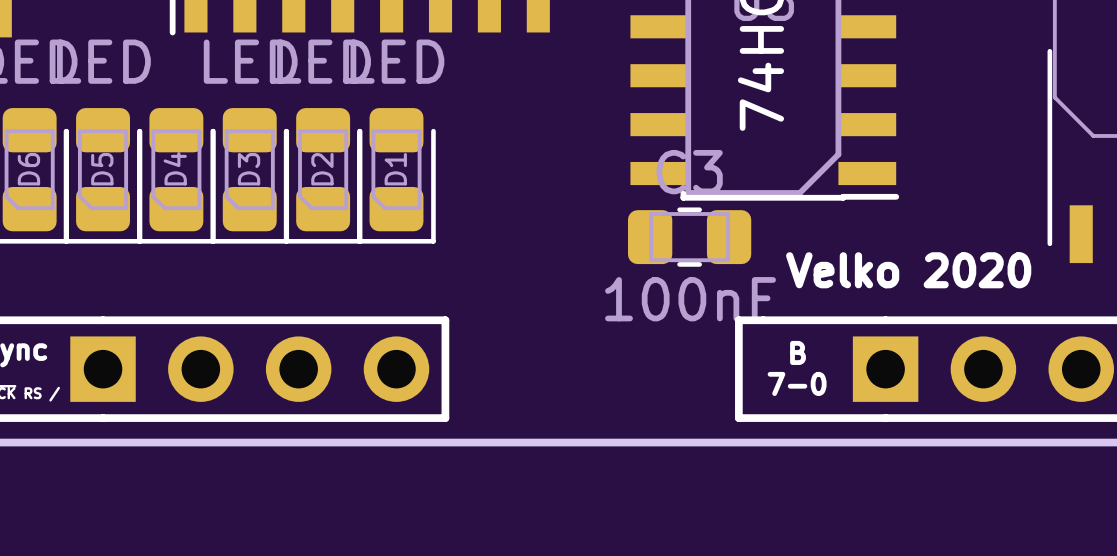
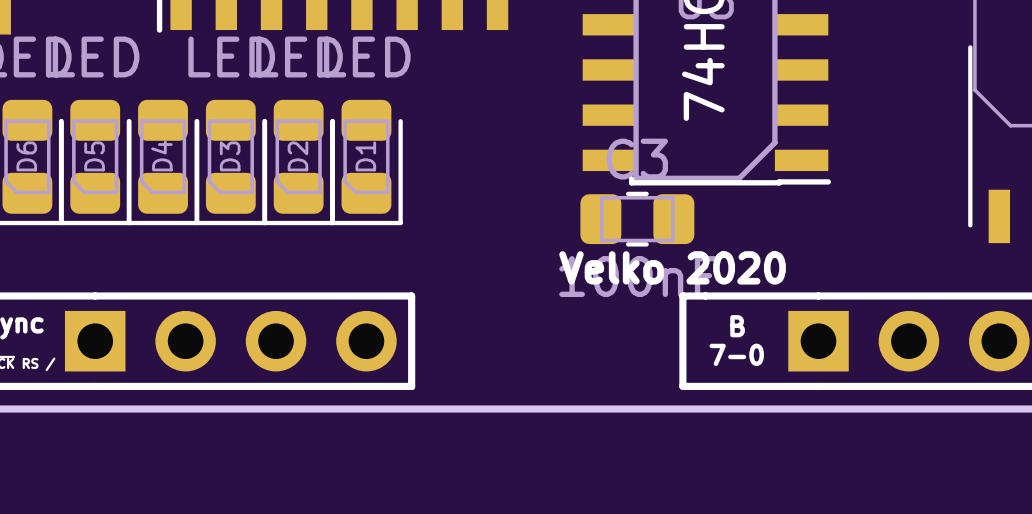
text position: Velko 2020 (908, 270) -> Velko 2020 (672, 267)

